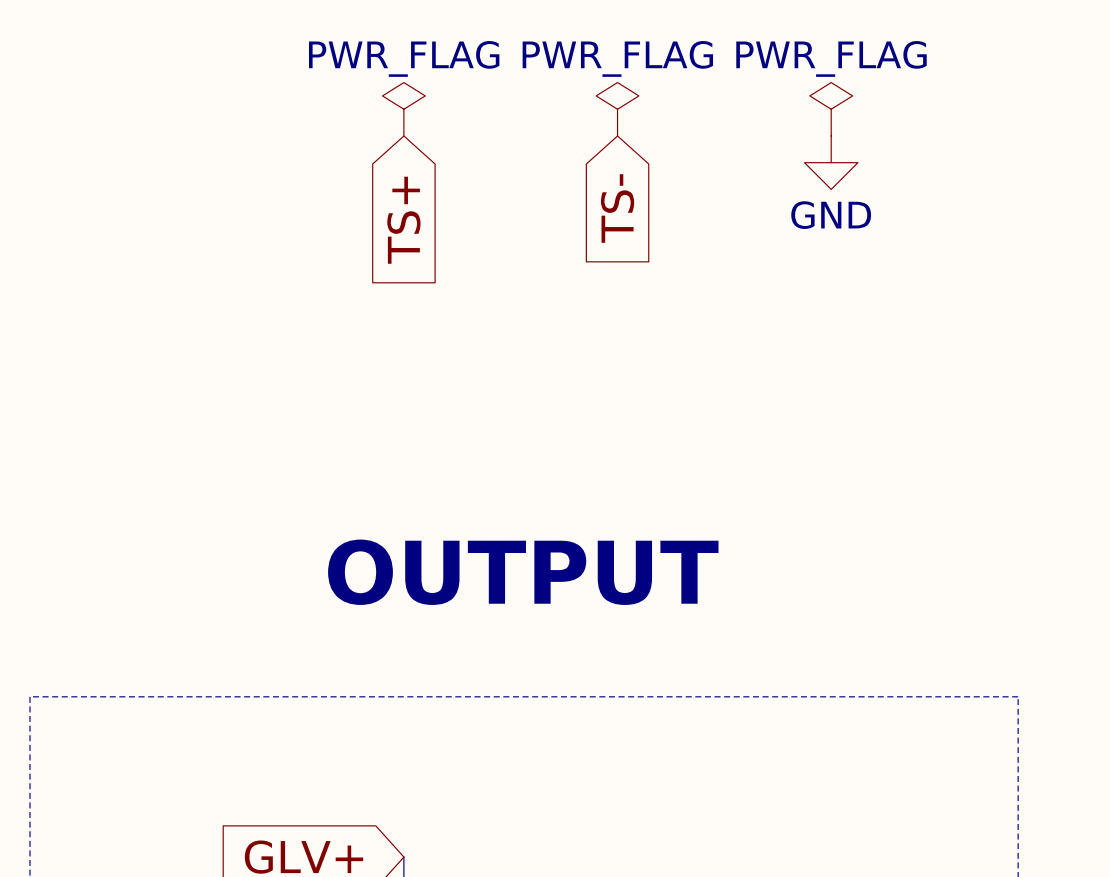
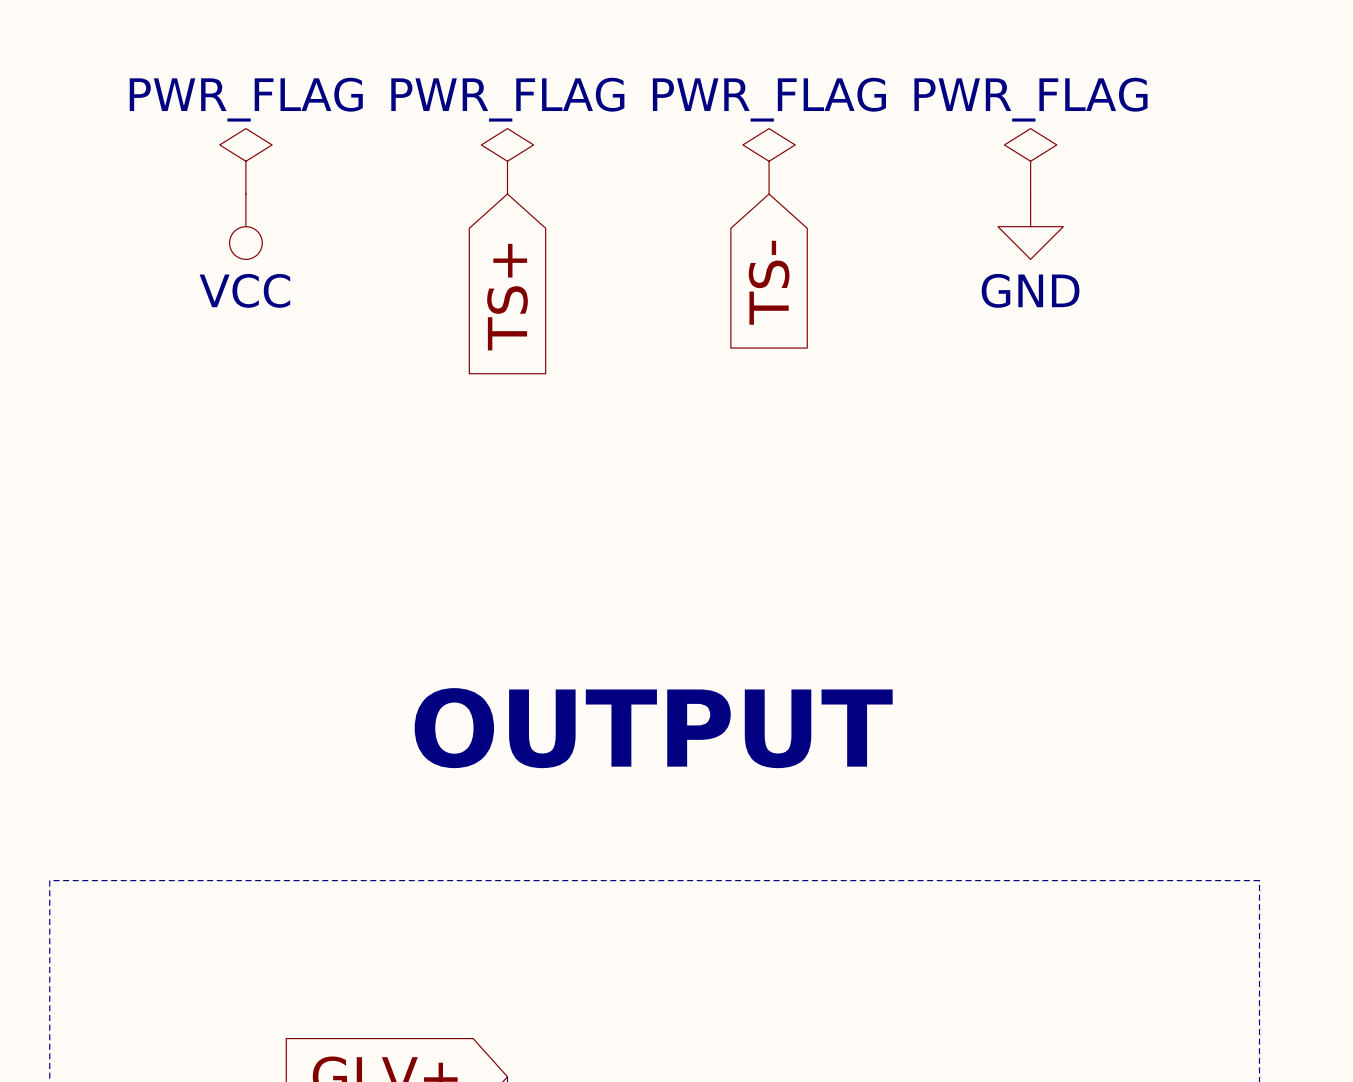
power symbol: none -> PWR_FLAG (245, 161)
power symbol: none -> VCC (245, 226)

